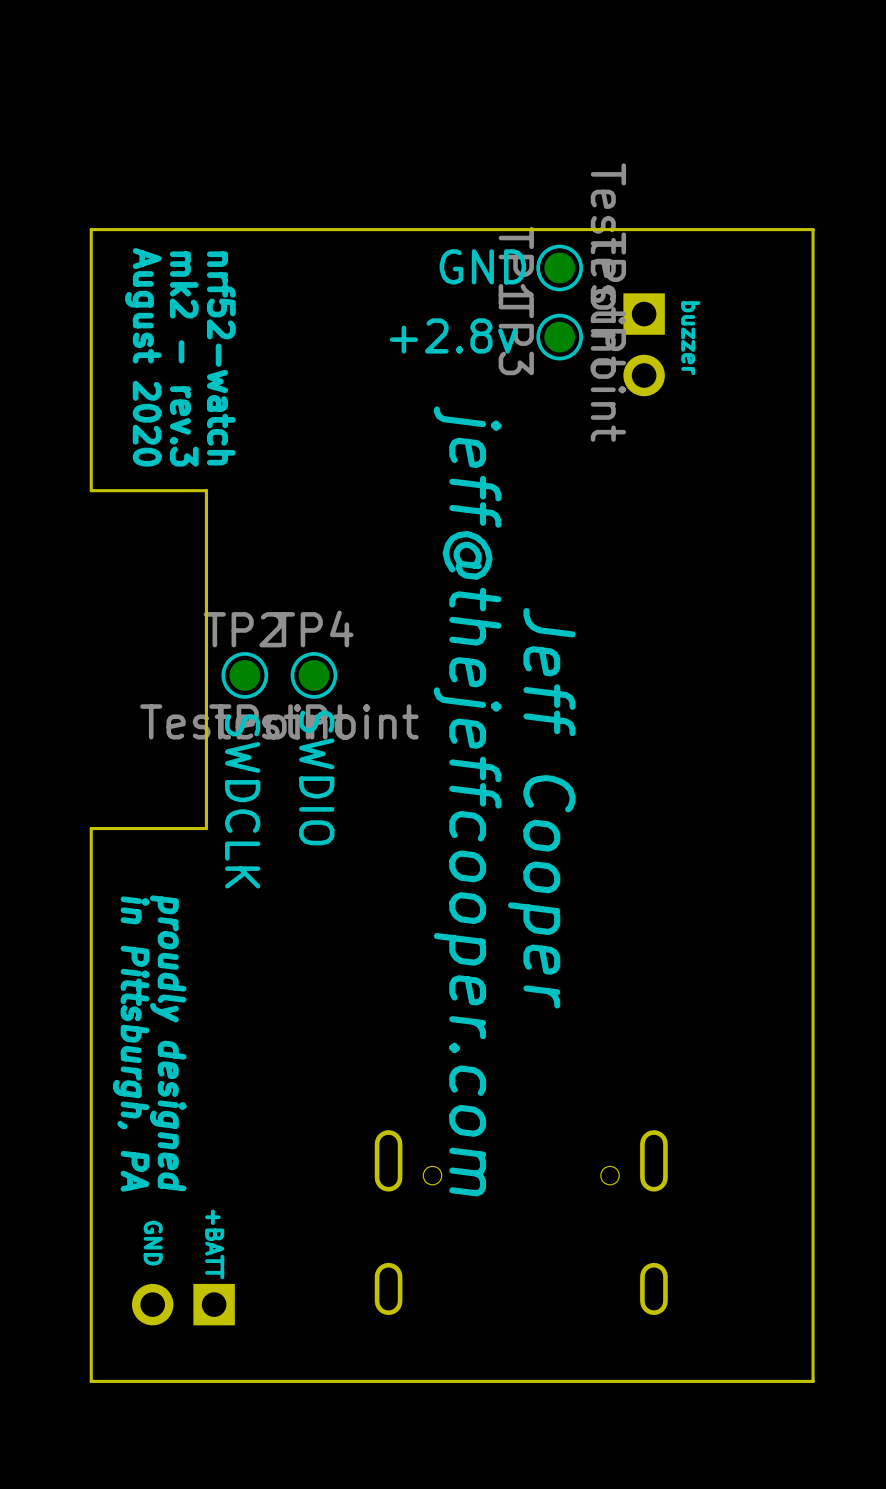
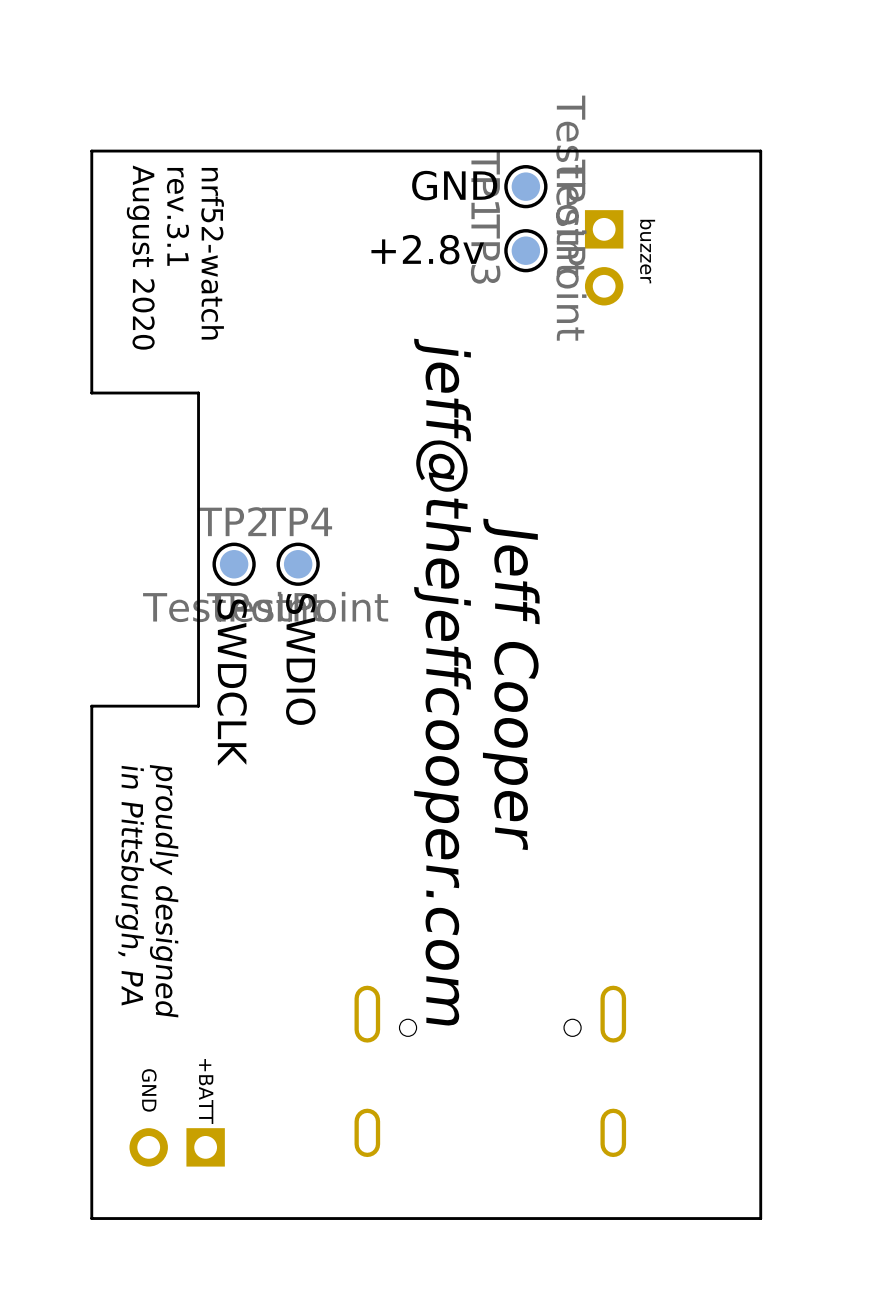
text: mk2 - rev.3 (184, 358) -> rev.3.1 (177, 216)

